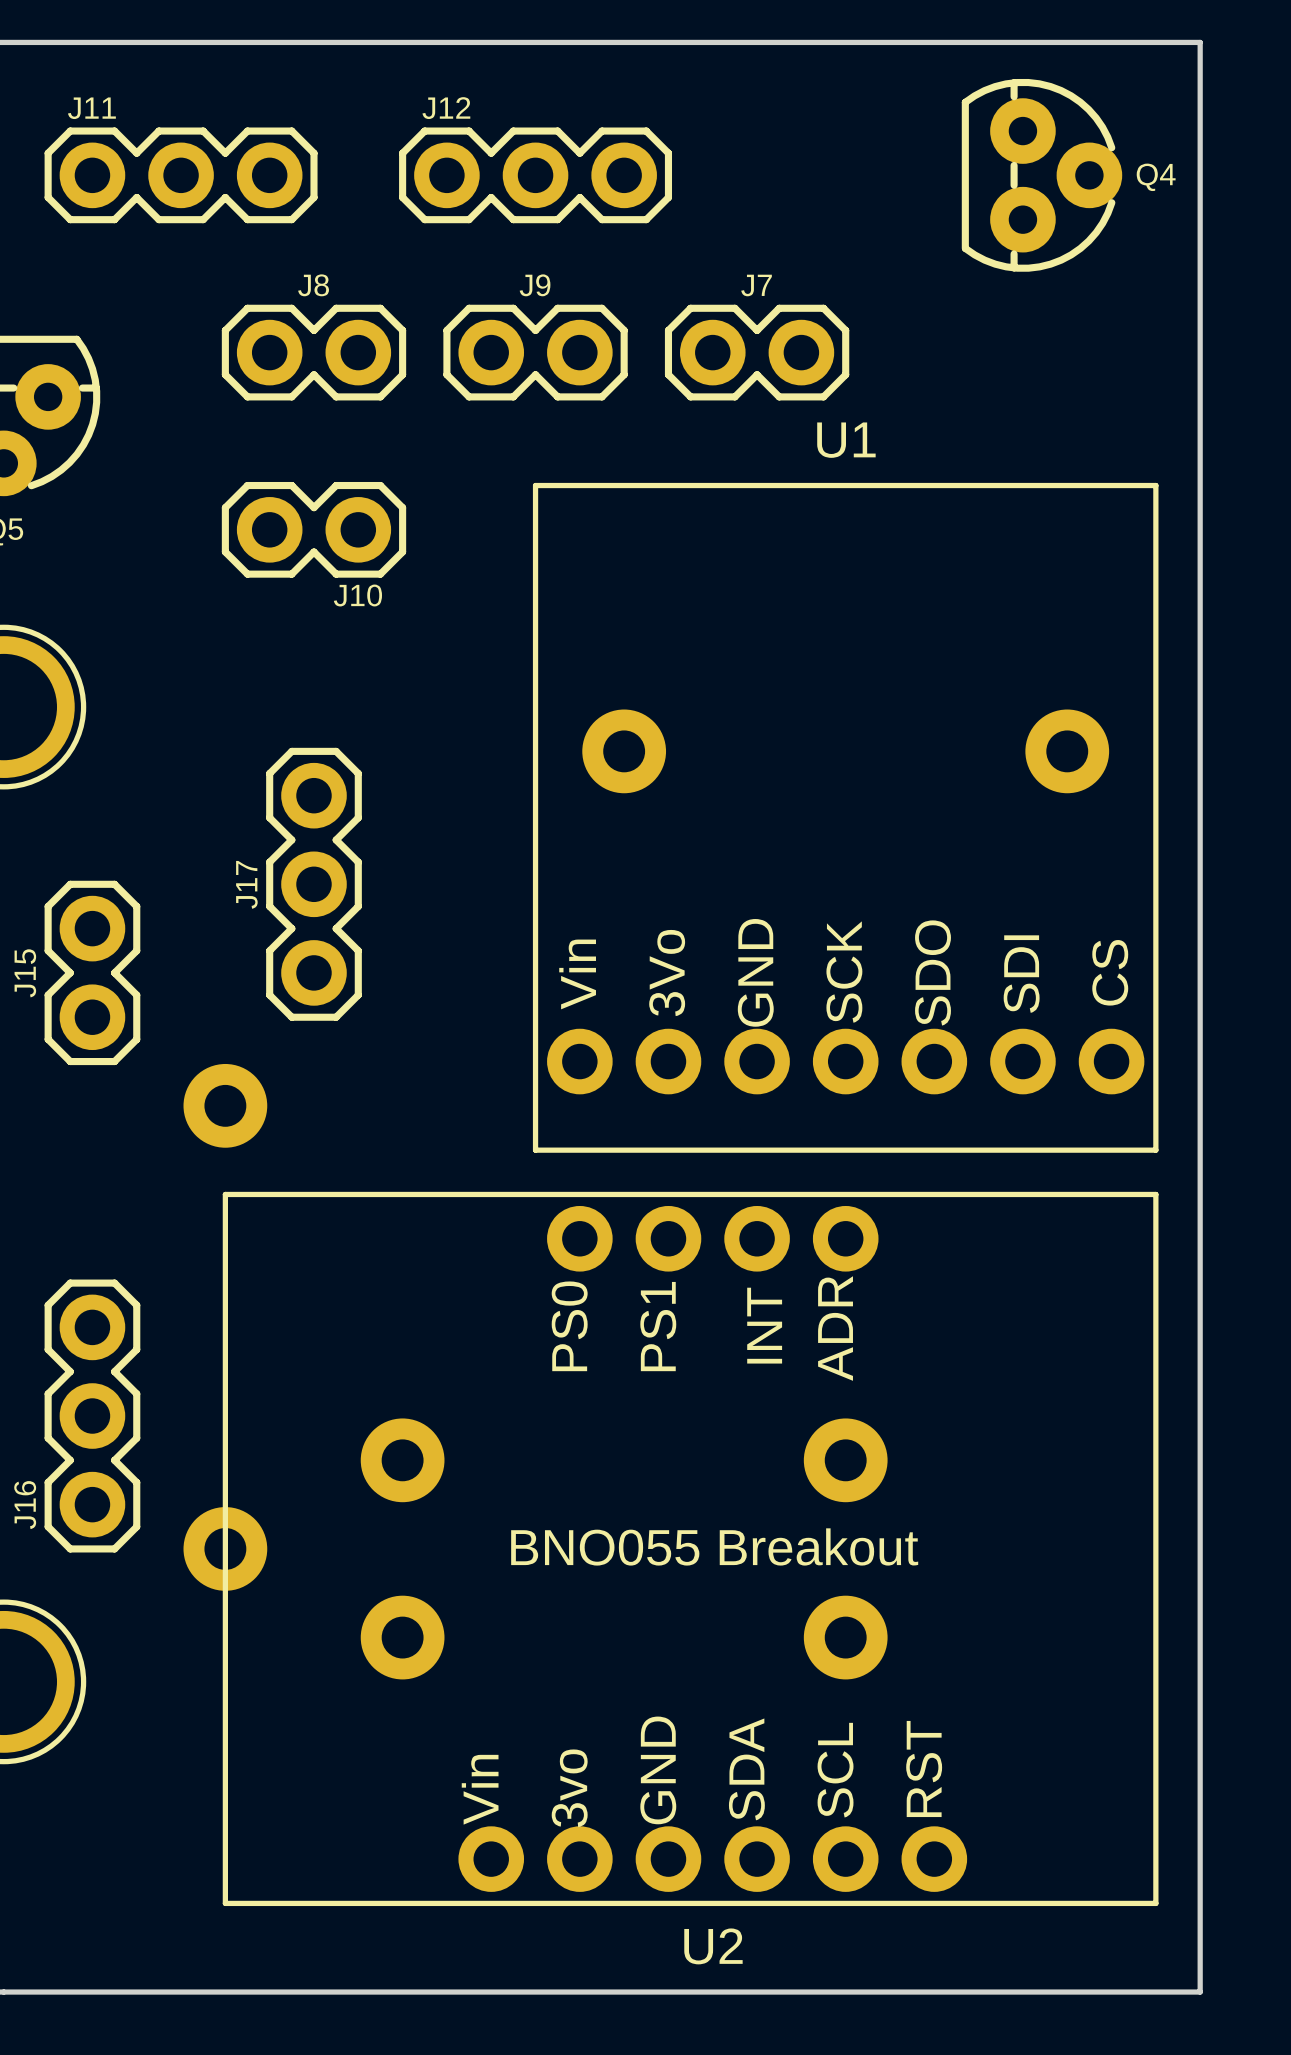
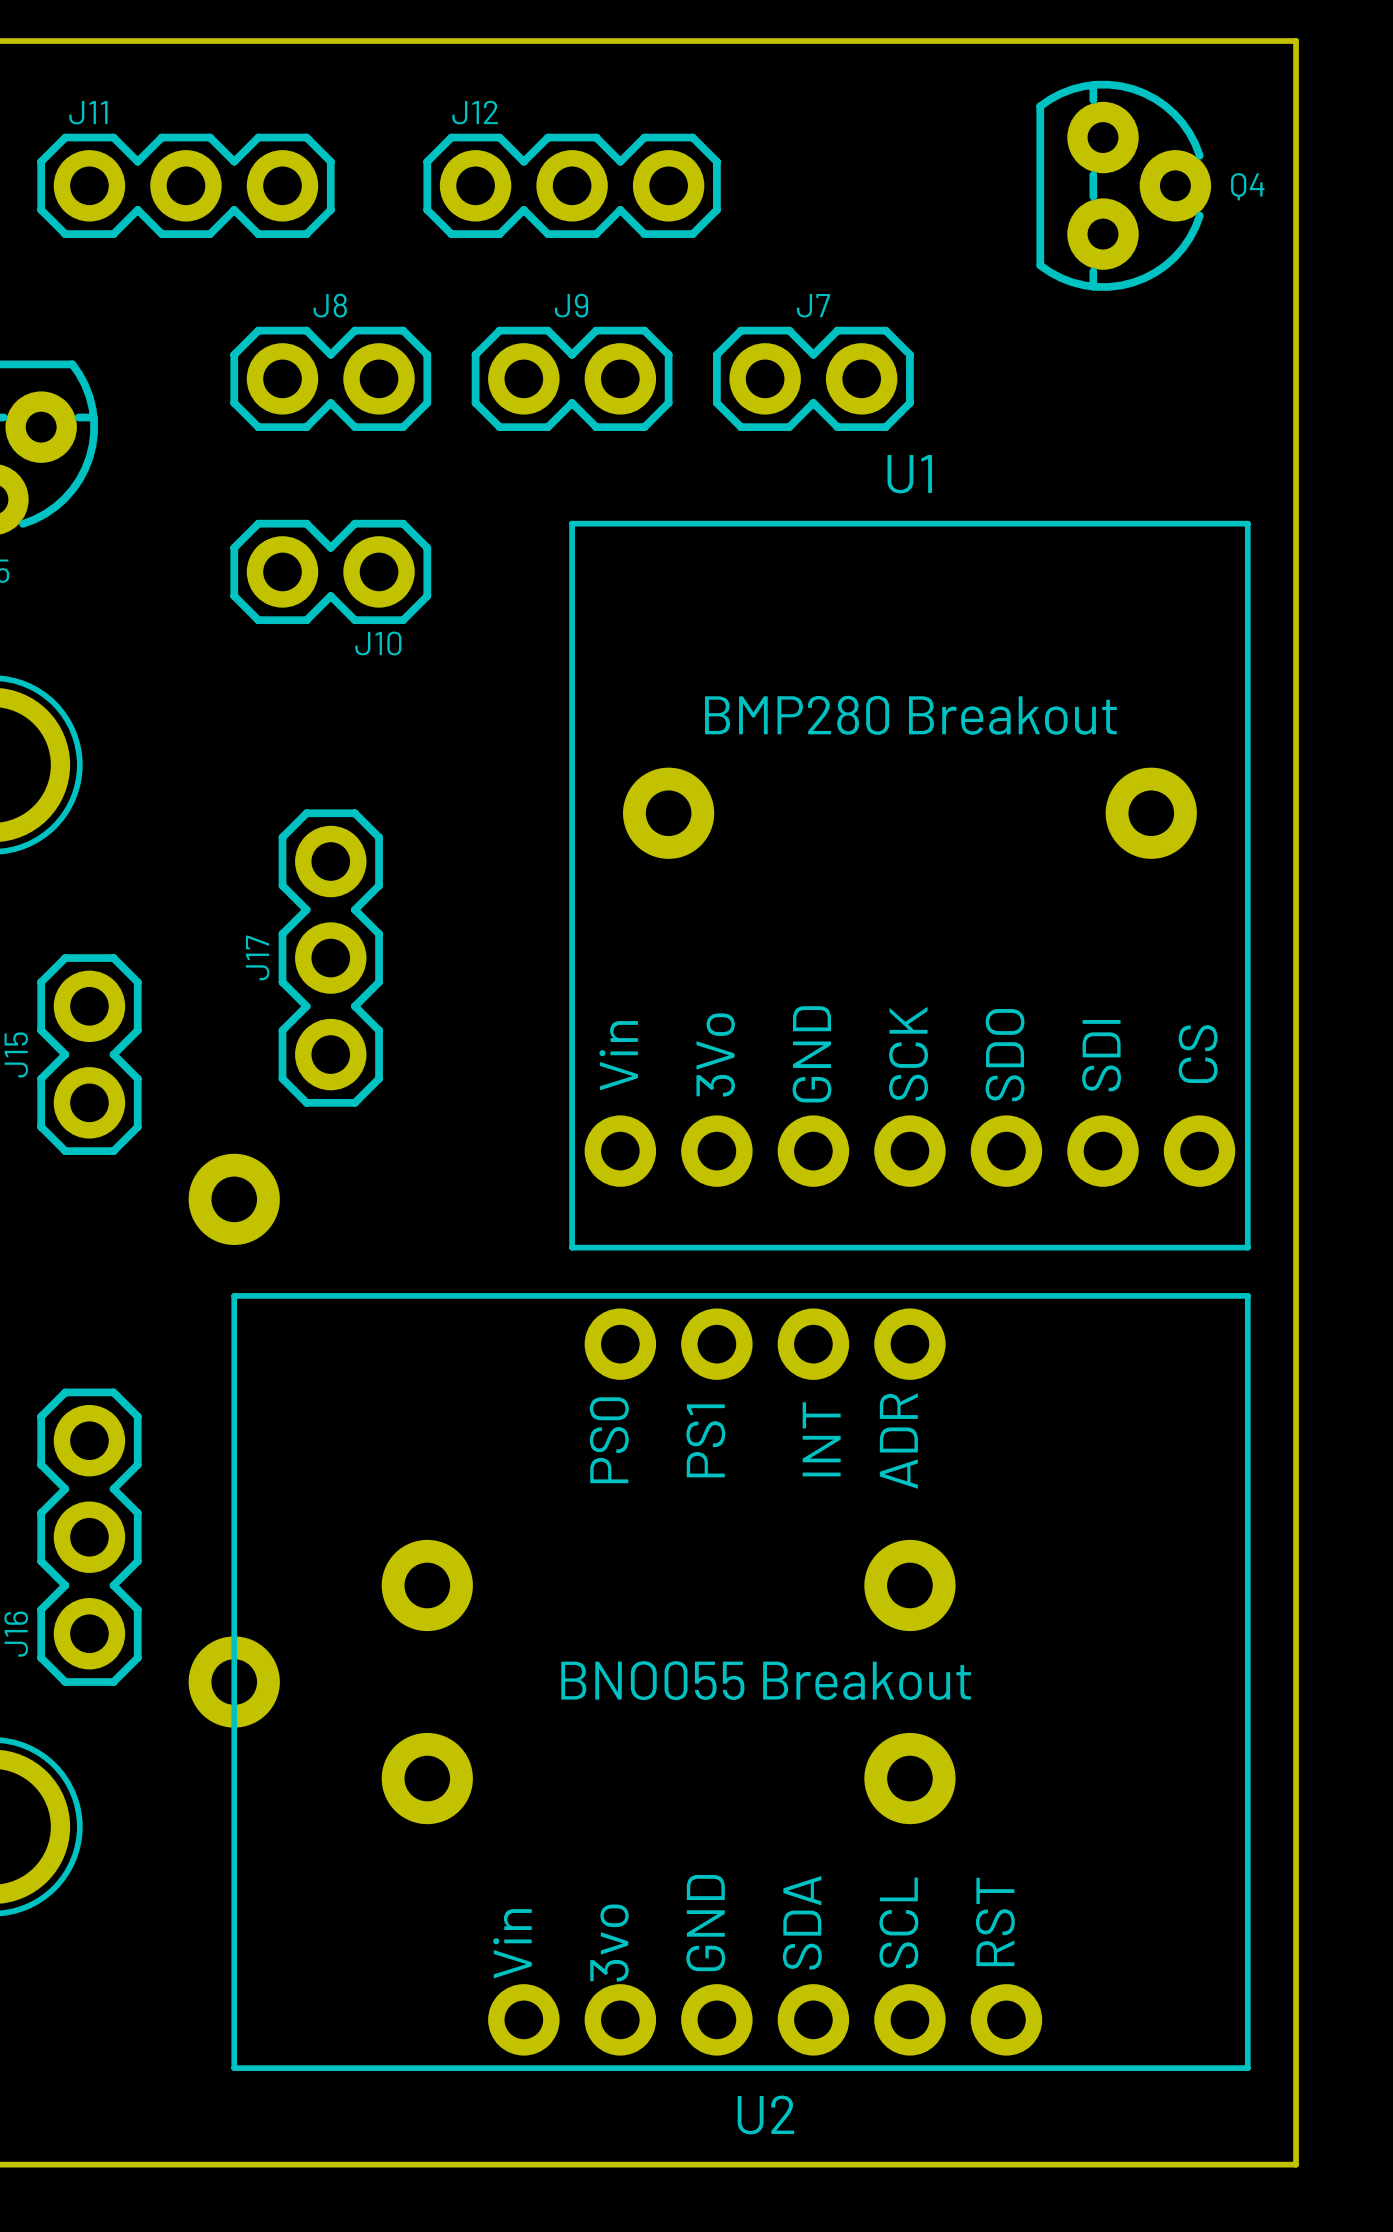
U1 value: none -> BMP280 Breakout (910, 715)

